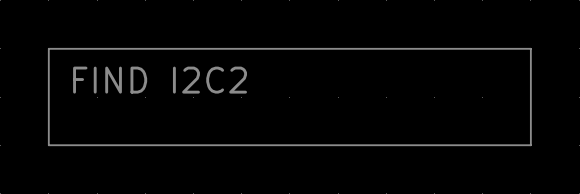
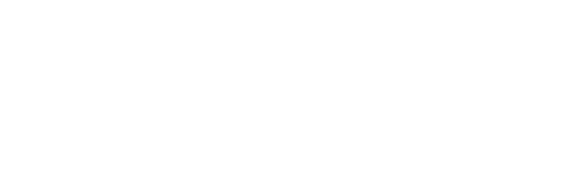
line: (48, 48) (530, 48) (530, 145) (48, 145) (48, 48) -> none
text: FIND I2C2 (160, 80) -> none

